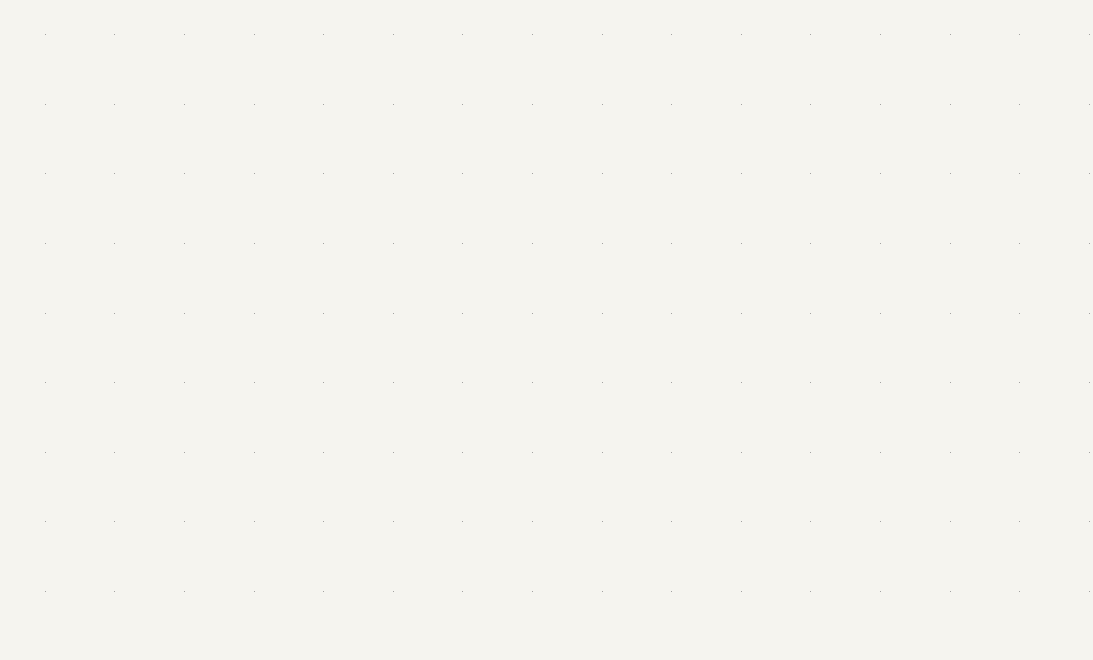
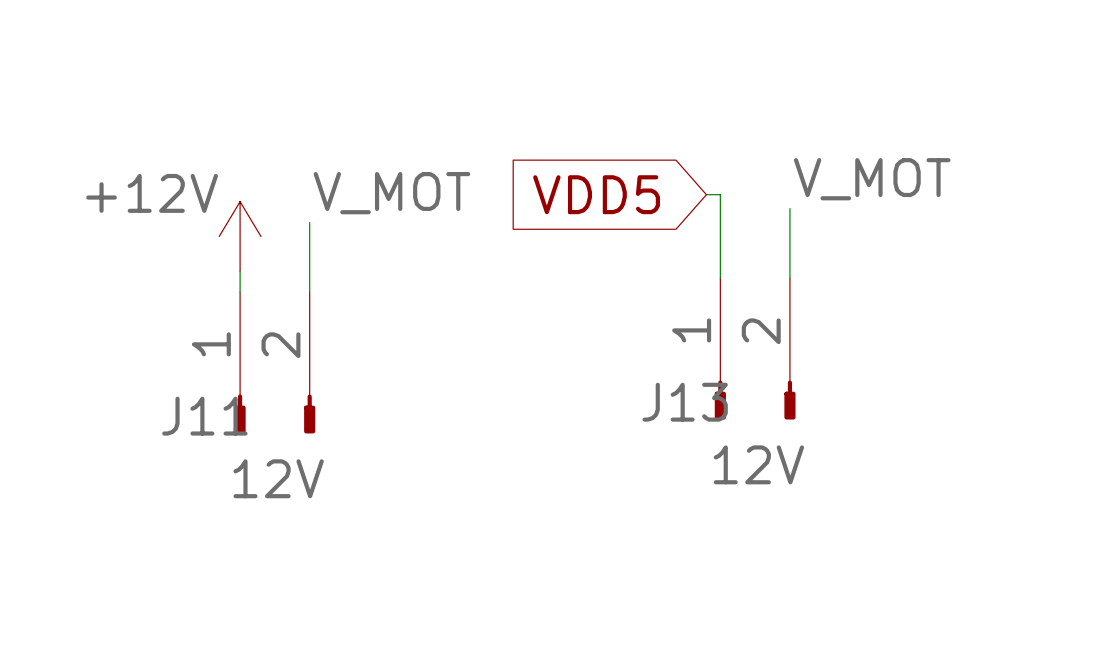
label: none -> V_MOT (872, 179)
wire: none -> (706, 194) (720, 194) (720, 278)
global label: none -> VDD5 (596, 194)
label: none -> V_MOT (391, 193)
wire: none -> (789, 208) (789, 278)
wire: none -> (309, 222) (309, 292)
power symbol: none -> +12V (240, 236)
wire: none -> (240, 271) (240, 292)
J13: none -> 12V (755, 348)
J11: none -> 12V (274, 362)

